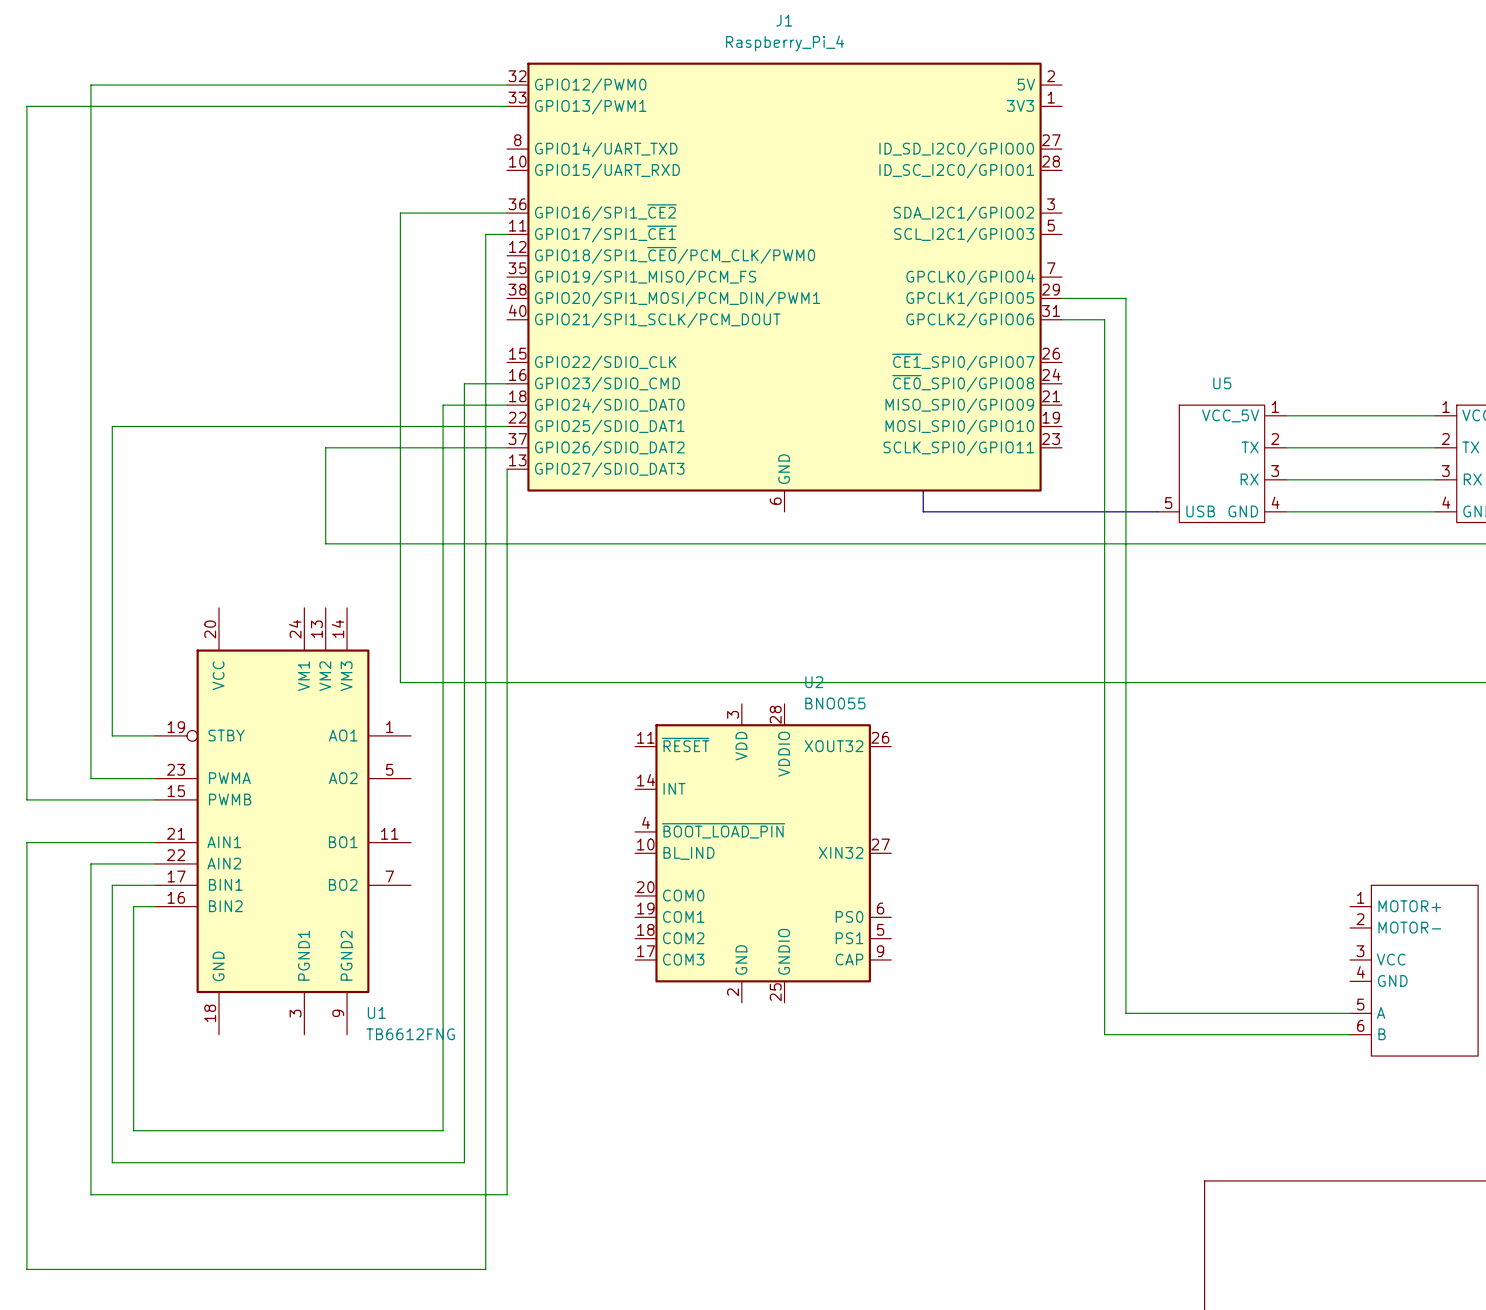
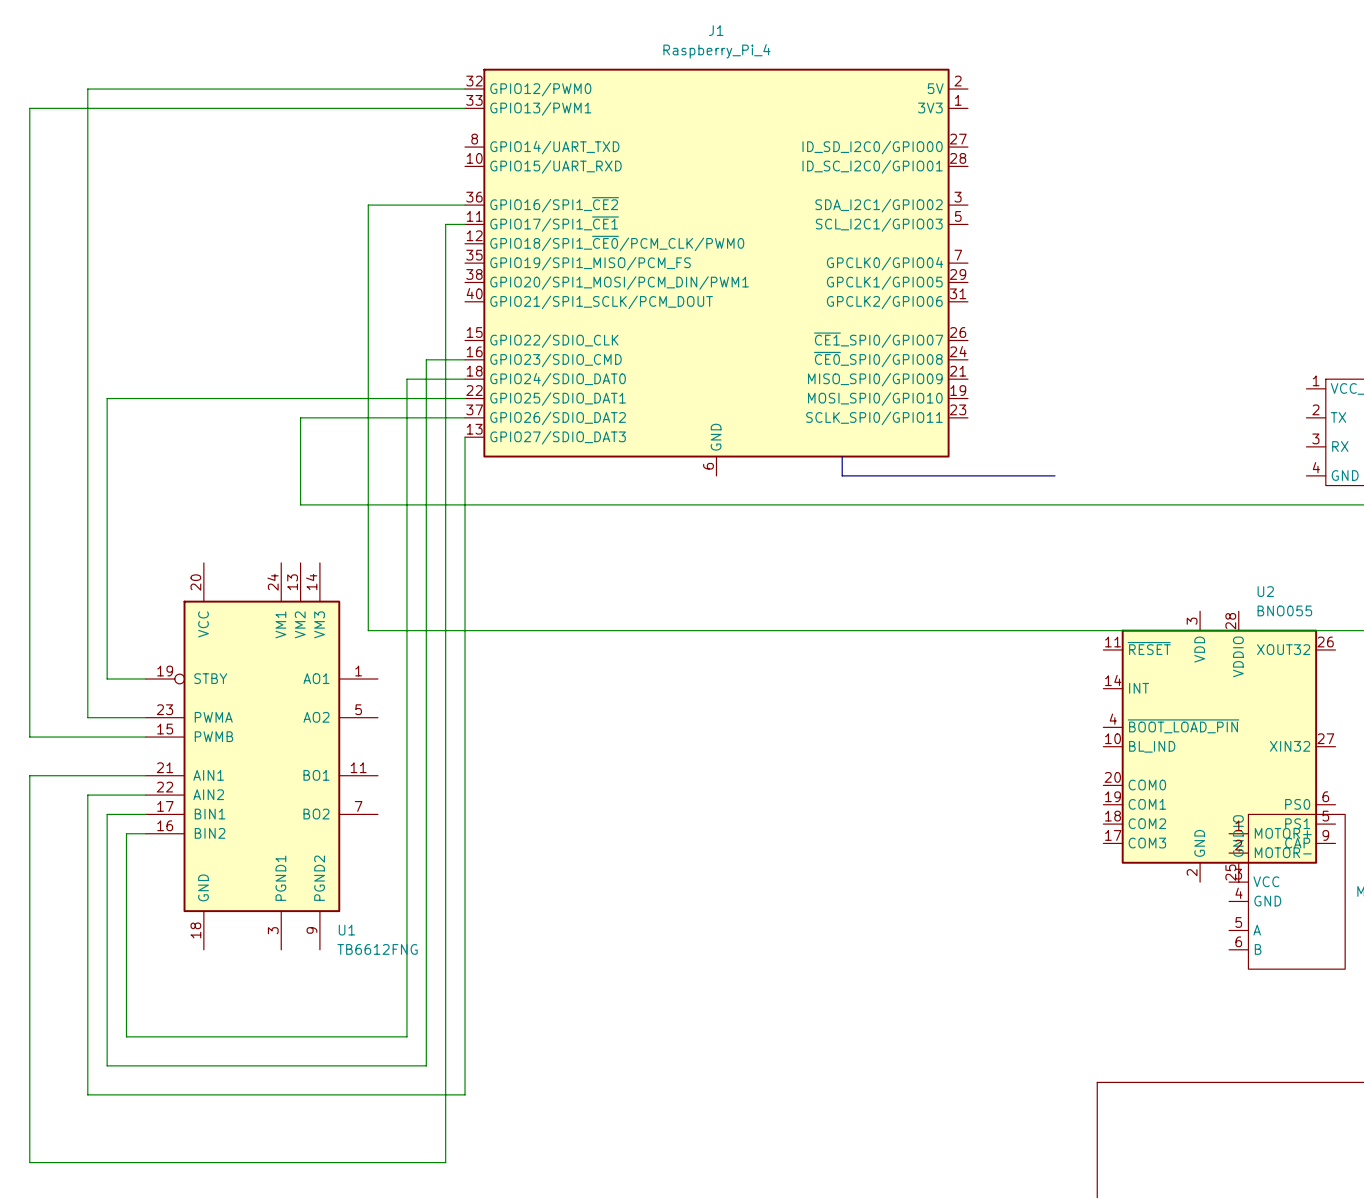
wire: (1061, 298) (1125, 298) (1125, 1013) (1350, 1013) -> none
wire: (1061, 319) (1104, 319) (1104, 1034) (1350, 1034) -> none
wire: (1286, 415) (1435, 415) -> none
wire: (1286, 447) (1435, 447) -> none
U5: (1221, 463) -> none
wire: (1286, 479) (1435, 479) -> none
wire: (1286, 511) (1435, 511) -> none
U2 position: (763, 853) -> (1219, 746)

